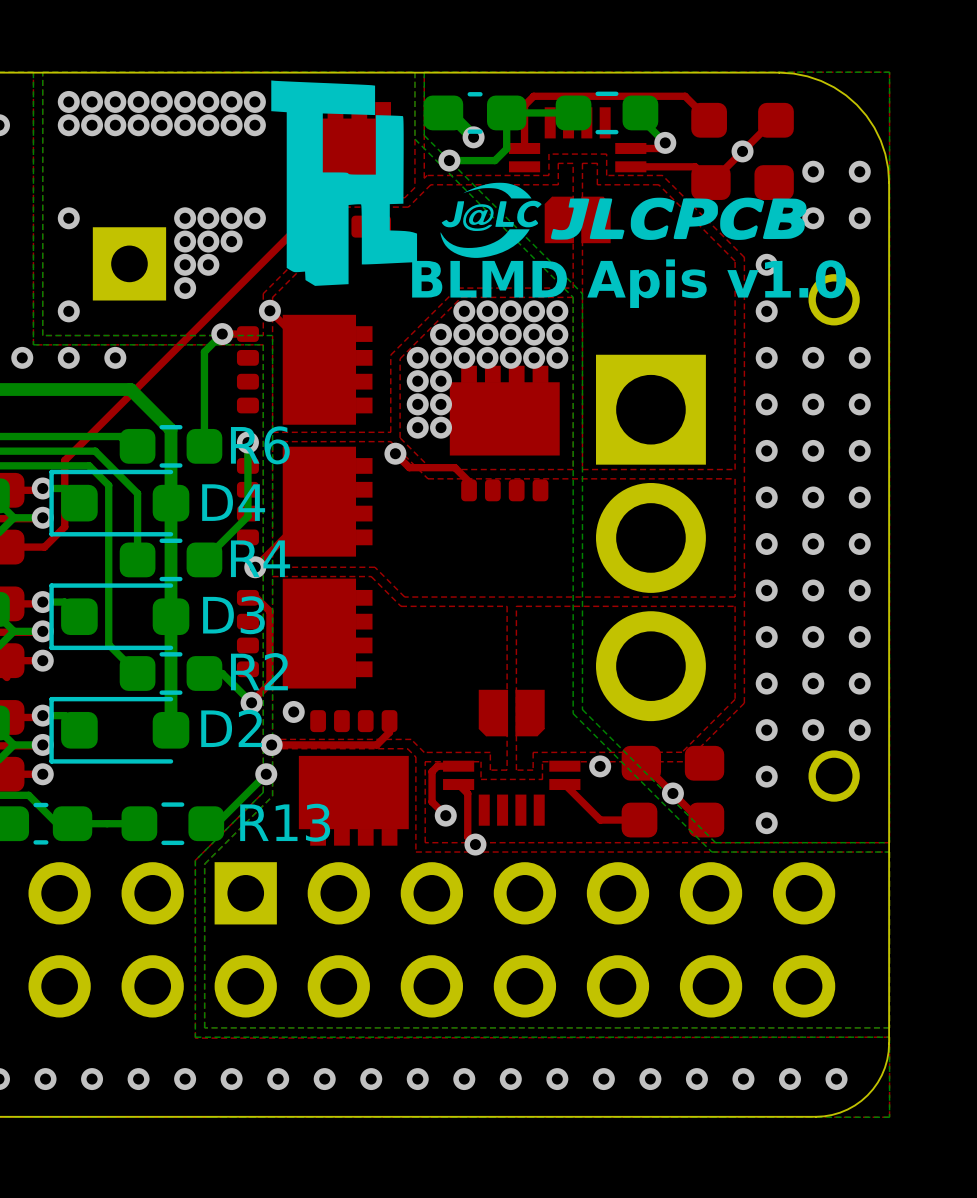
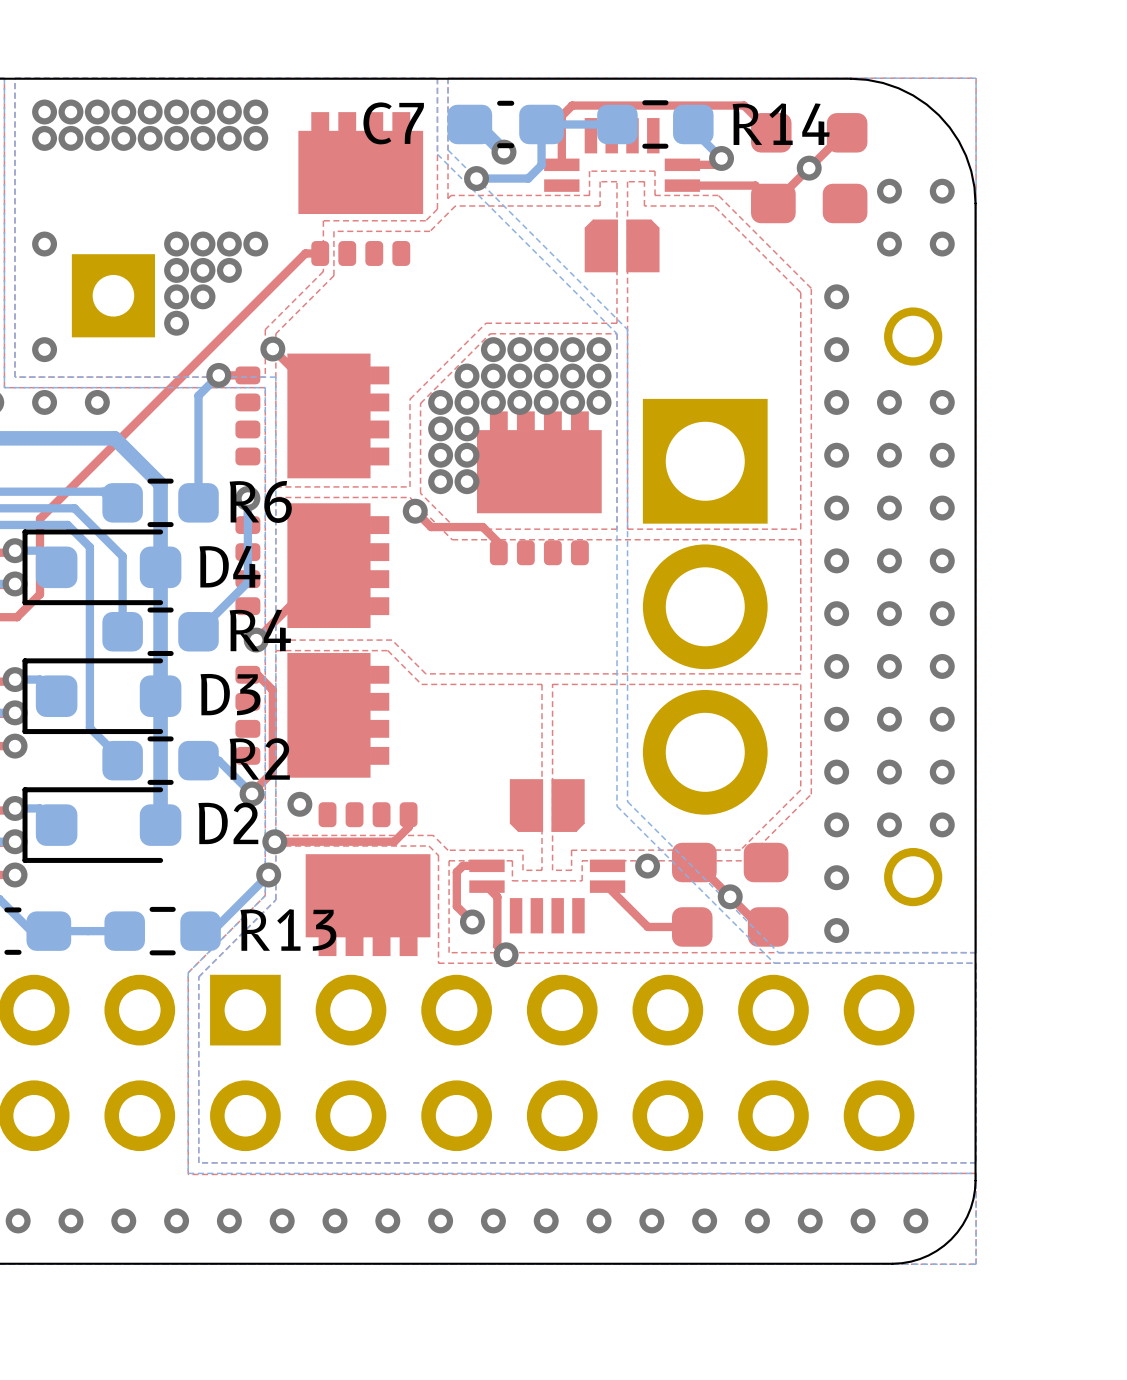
drawing: [271, 80, 807, 286] -> none
C7 name: none -> C7 (393, 123)
R14 name: none -> R14 (781, 124)
text: BLMD Apis v1.0 (629, 283) -> none

